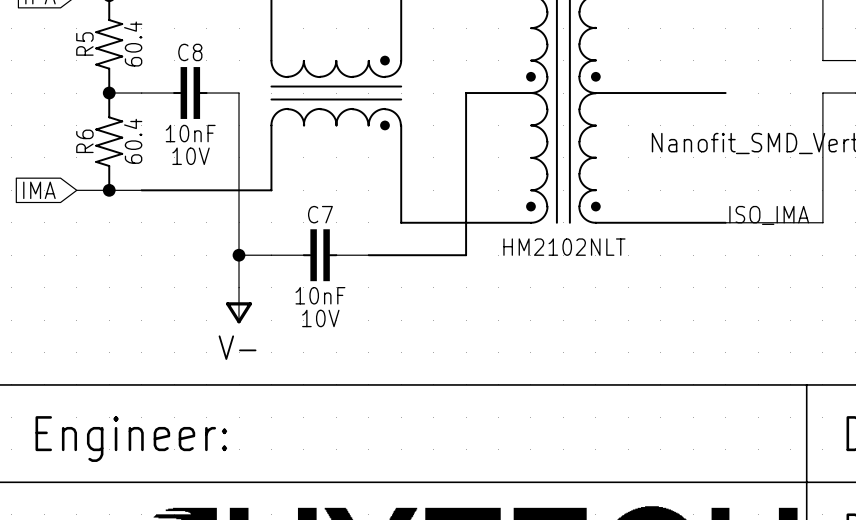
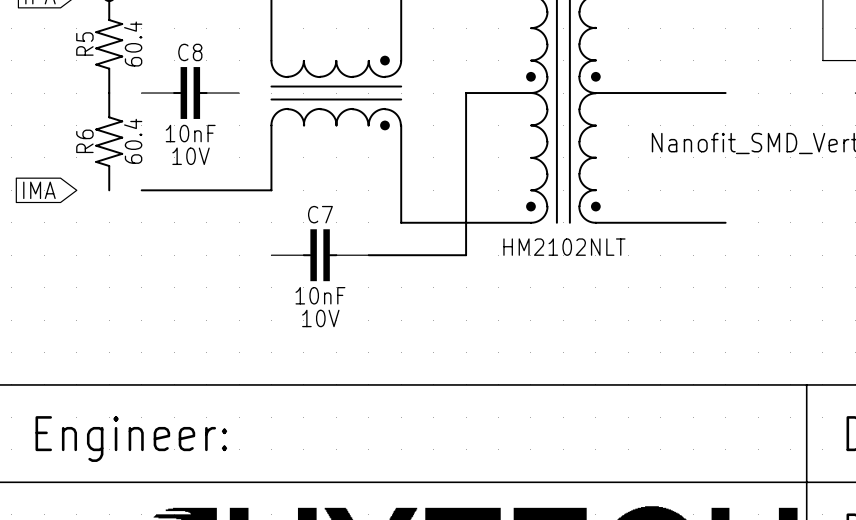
wire: (109, 93) (141, 93) -> none
junction: (109, 93) -> none
wire: (239, 93) (239, 287) -> none
wire: (855, 93) (822, 93) (822, 222) (725, 222) -> none
wire: (76, 190) (141, 190) -> none
junction: (109, 190) -> none
label: ISO_IMA (769, 215) -> none
wire: (239, 255) (271, 255) -> none
junction: (239, 255) -> none
power symbol: V- (239, 305) -> none

